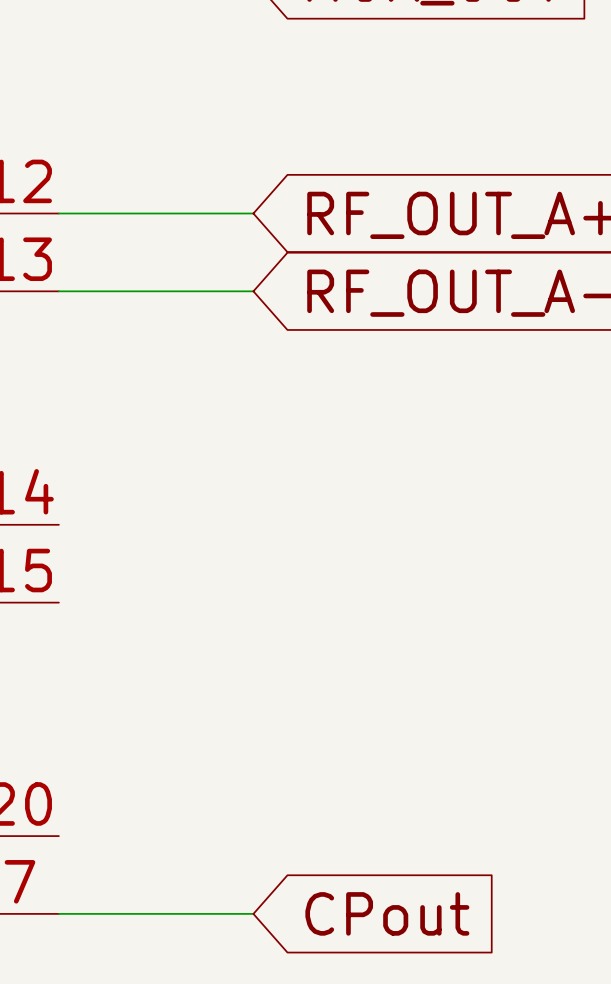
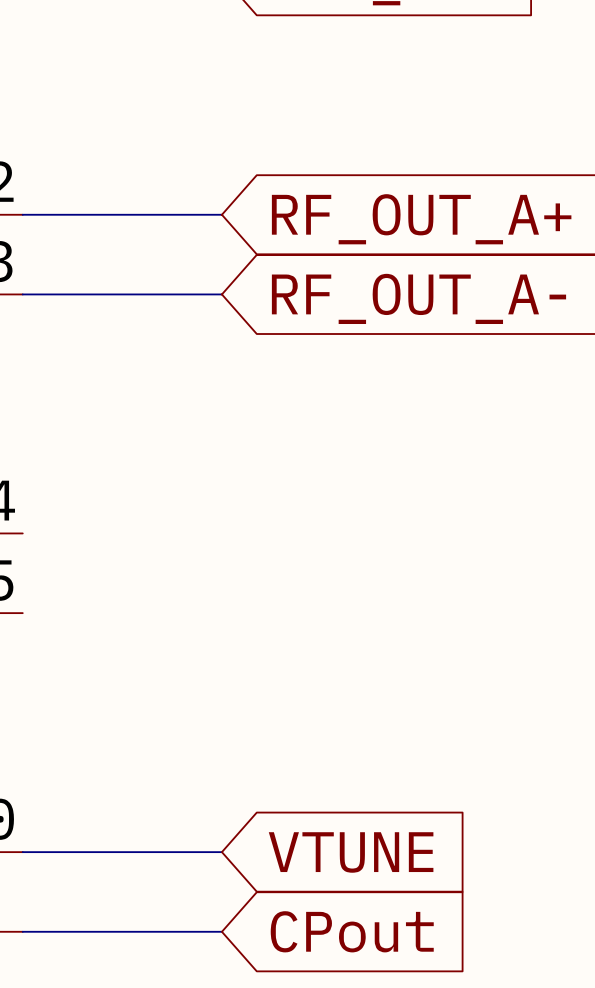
wire: none -> (22, 852) (221, 852)
global label: none -> VTUNE (351, 852)

